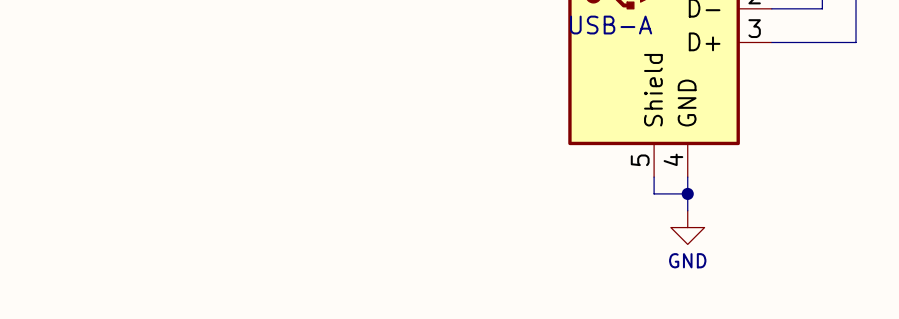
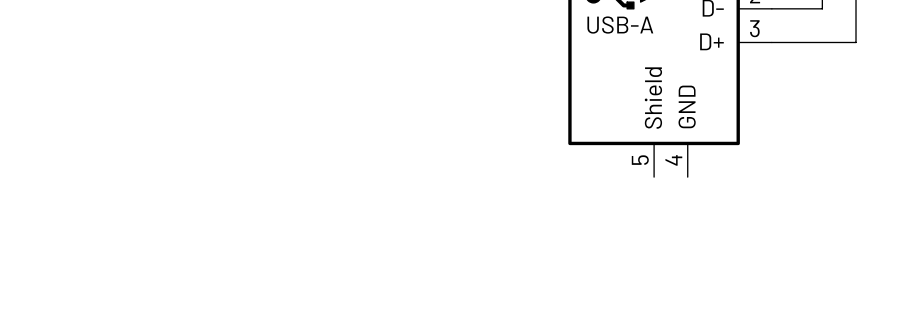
wire: (654, 177) (654, 193) (687, 193) -> none
wire: (687, 177) (687, 210) -> none
junction: (687, 193) -> none
power symbol: GND (687, 227) -> none

